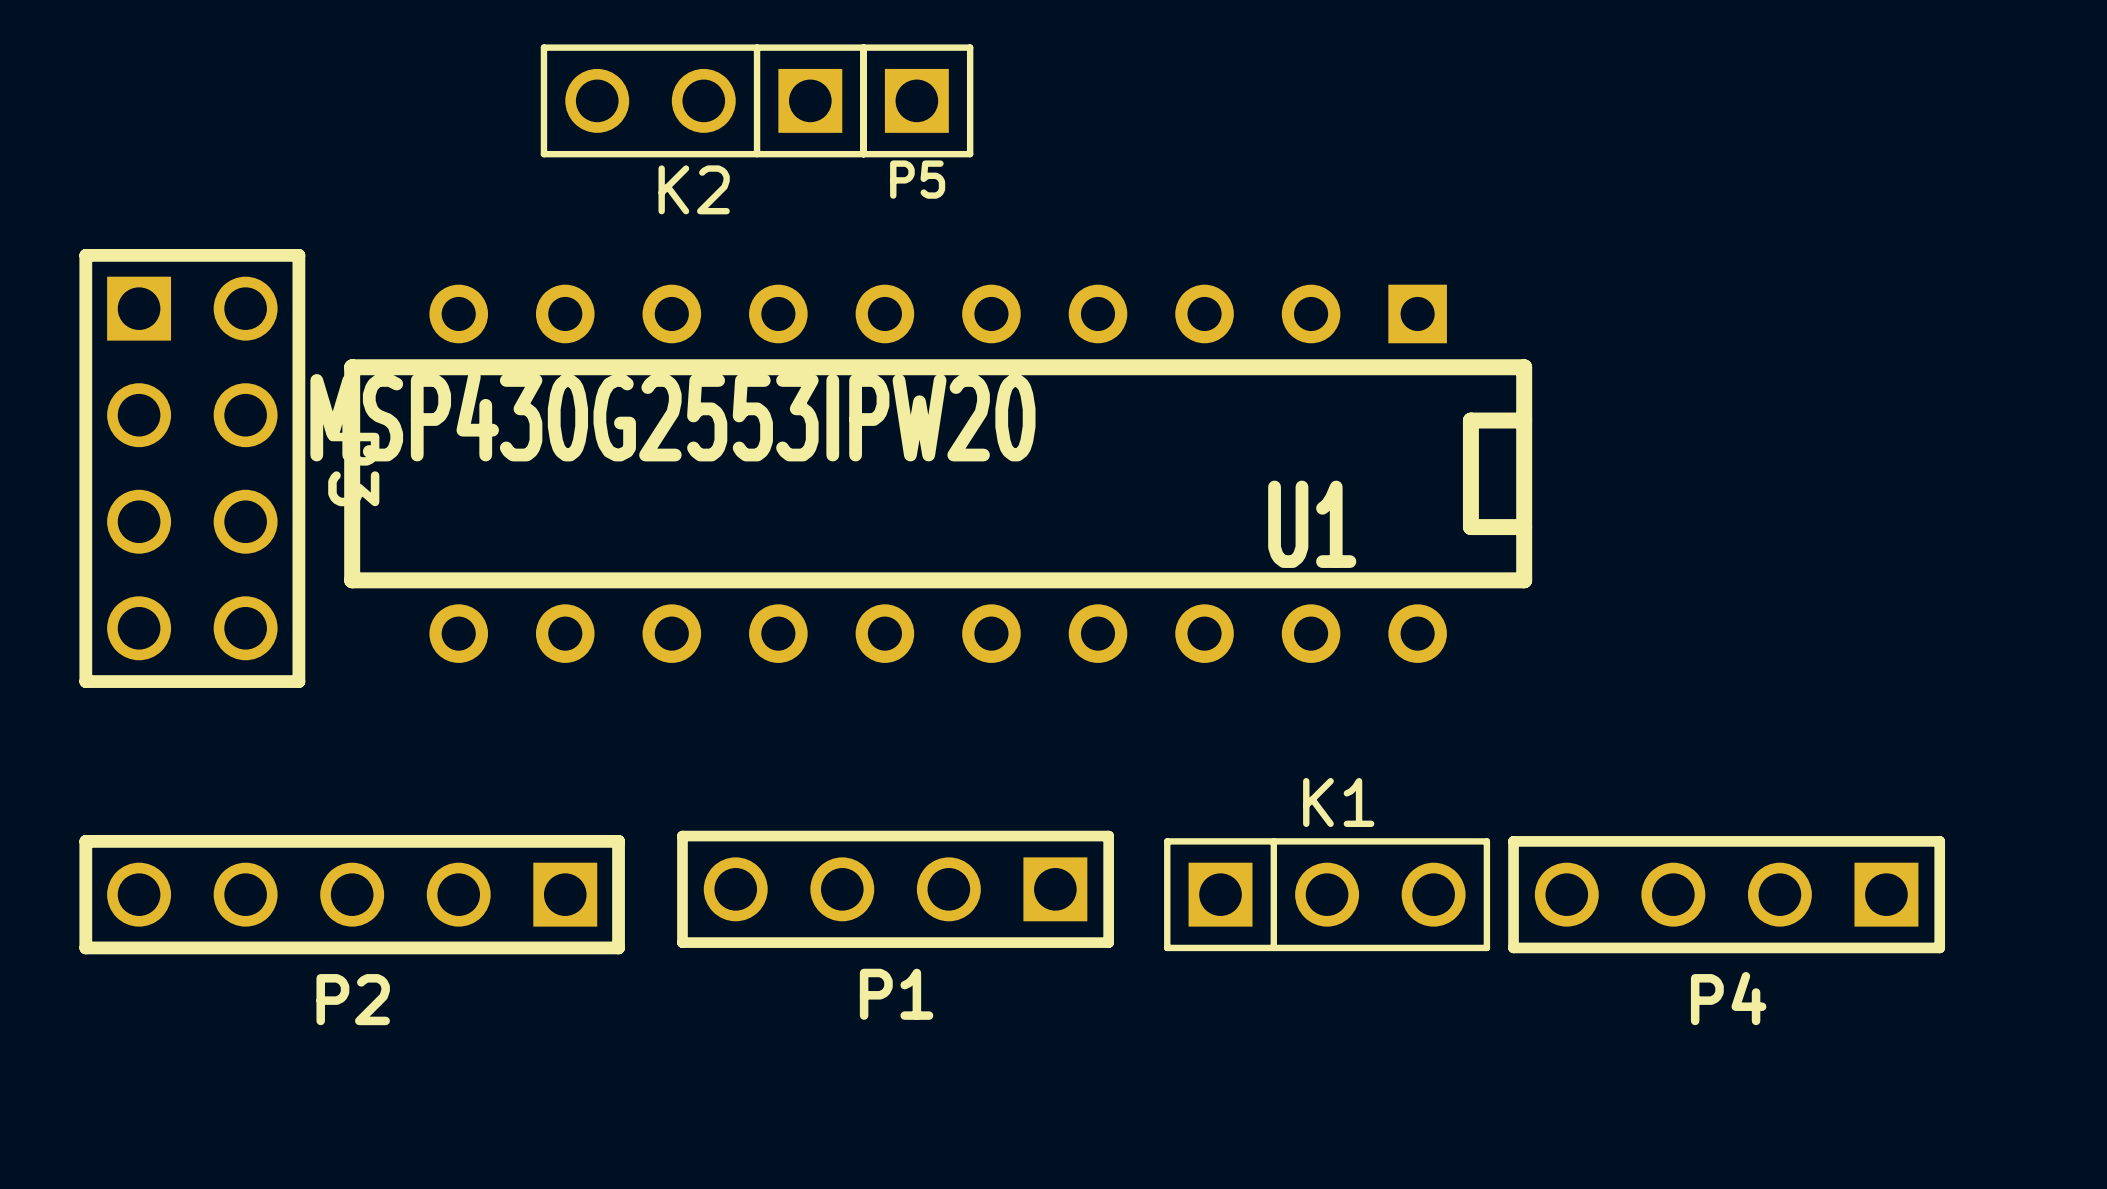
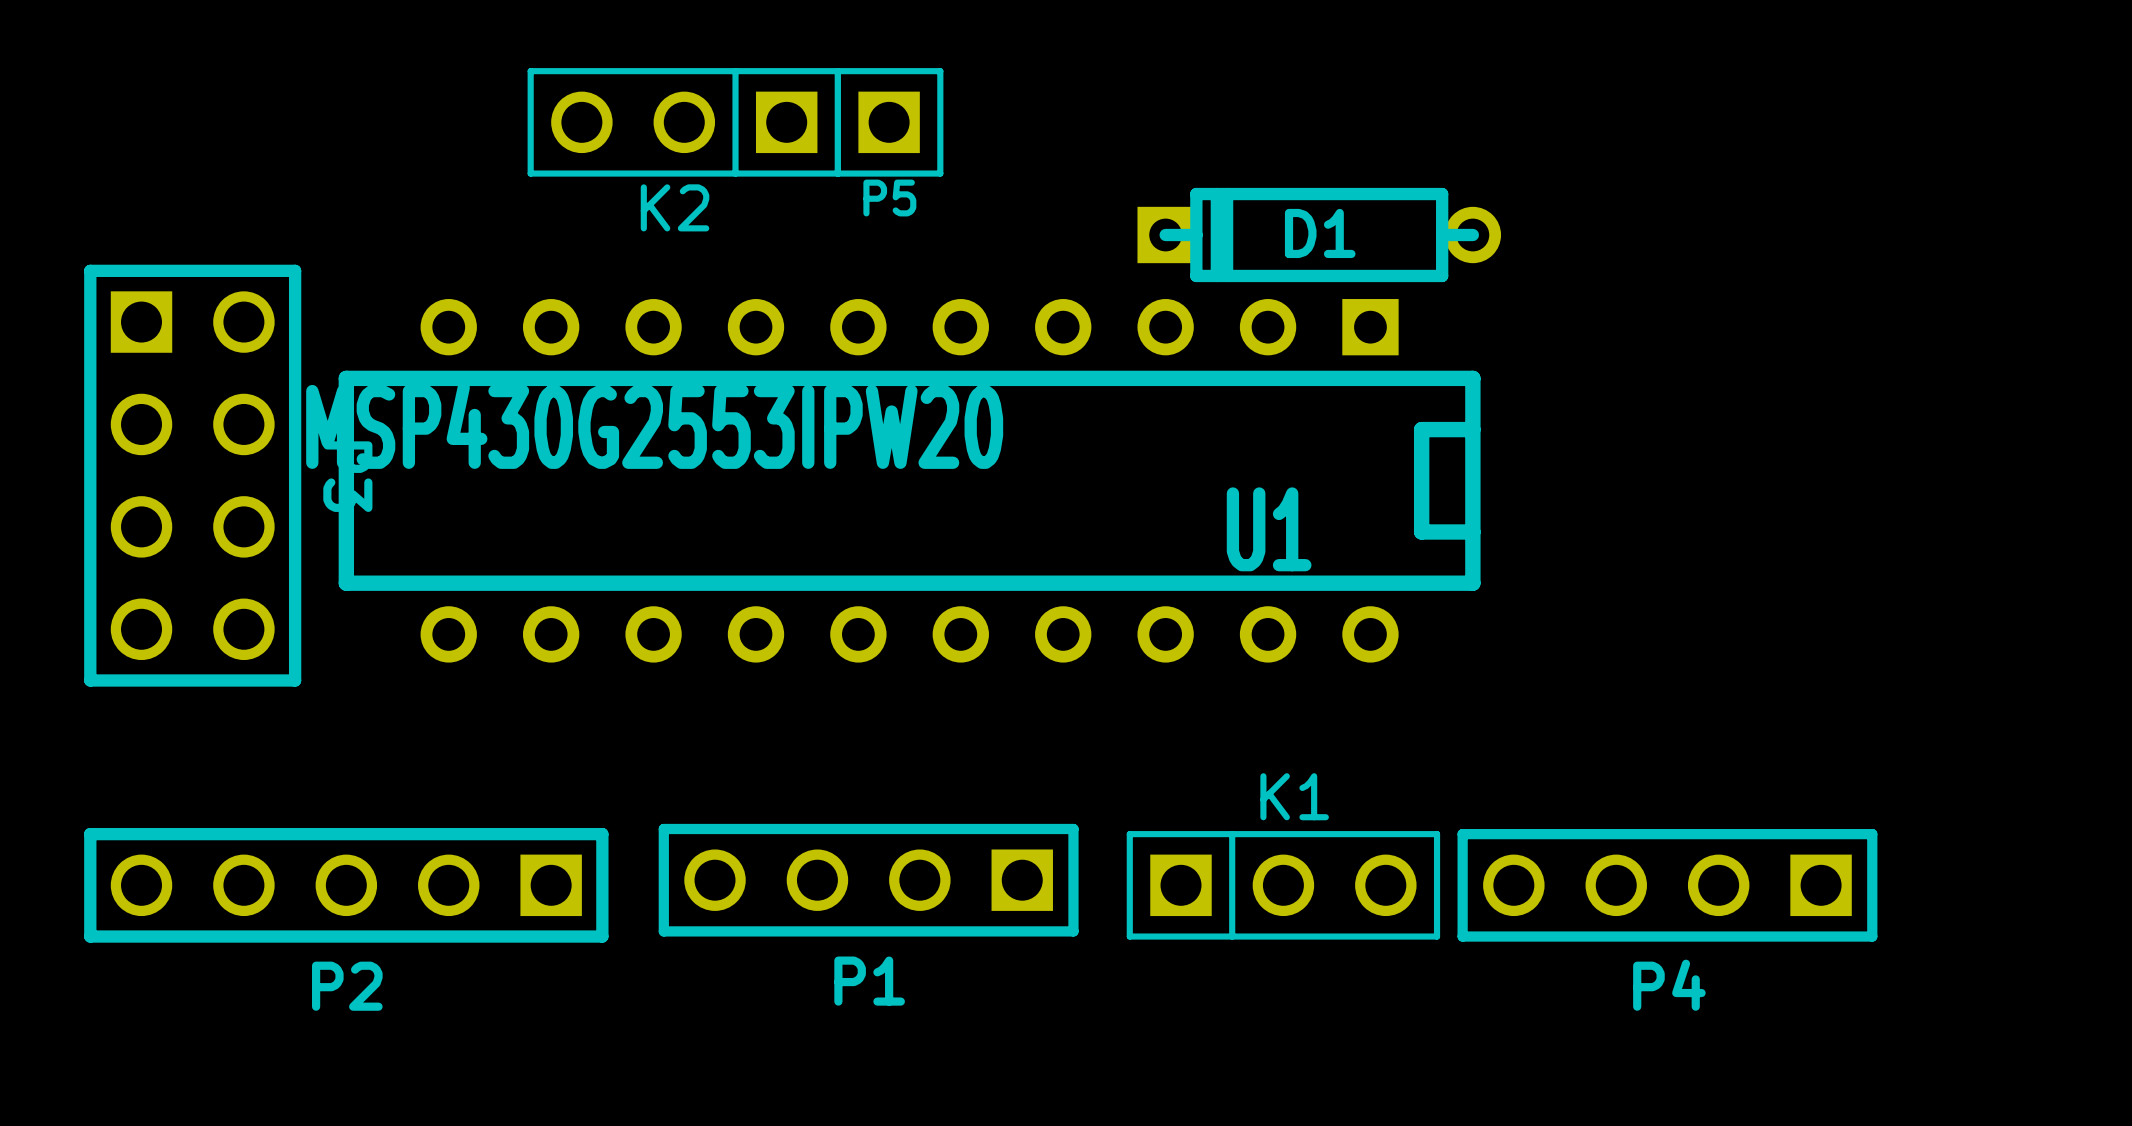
D1: none -> (1319, 235)

